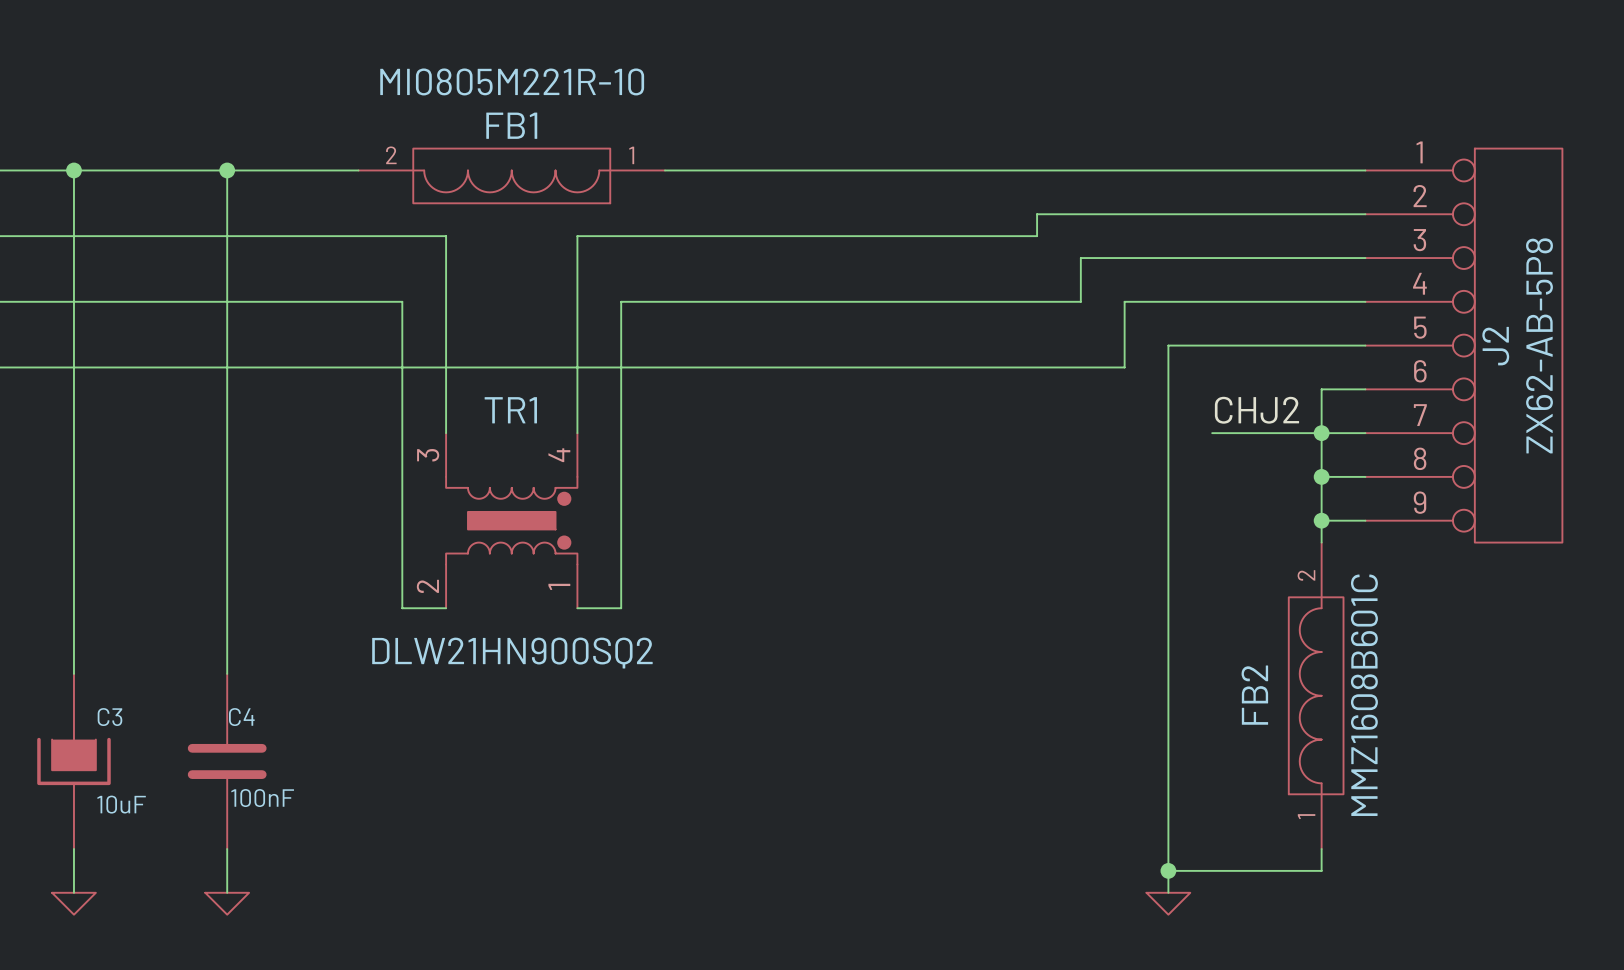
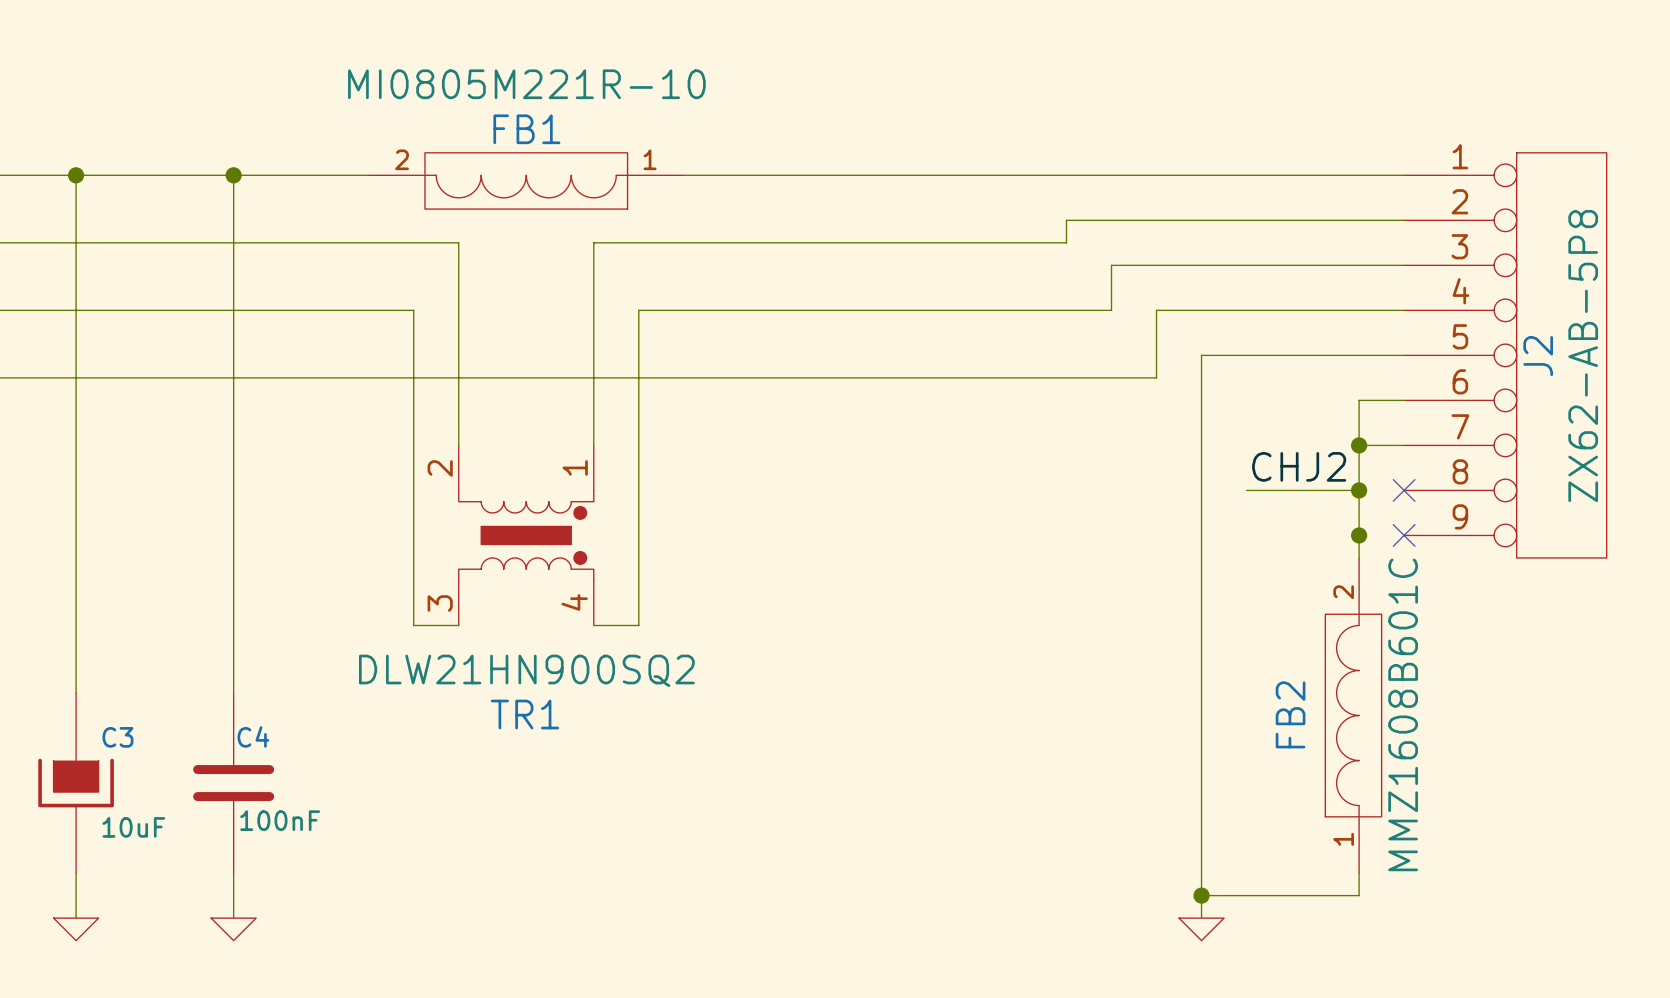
TR1 name position: TR1 (510, 410) -> TR1 (524, 714)
label position: CHJ2 (1256, 410) -> CHJ2 (1299, 466)
wire: (1212, 433) (1321, 433) -> none
wire: (1321, 476) (1365, 476) -> (1359, 490) (1246, 490)
no-connect mark: none -> (1404, 490)
TR1 flip: as is (511, 520) -> up-down (526, 535)
wire: (1321, 520) (1365, 520) -> none
no-connect mark: none -> (1404, 535)

